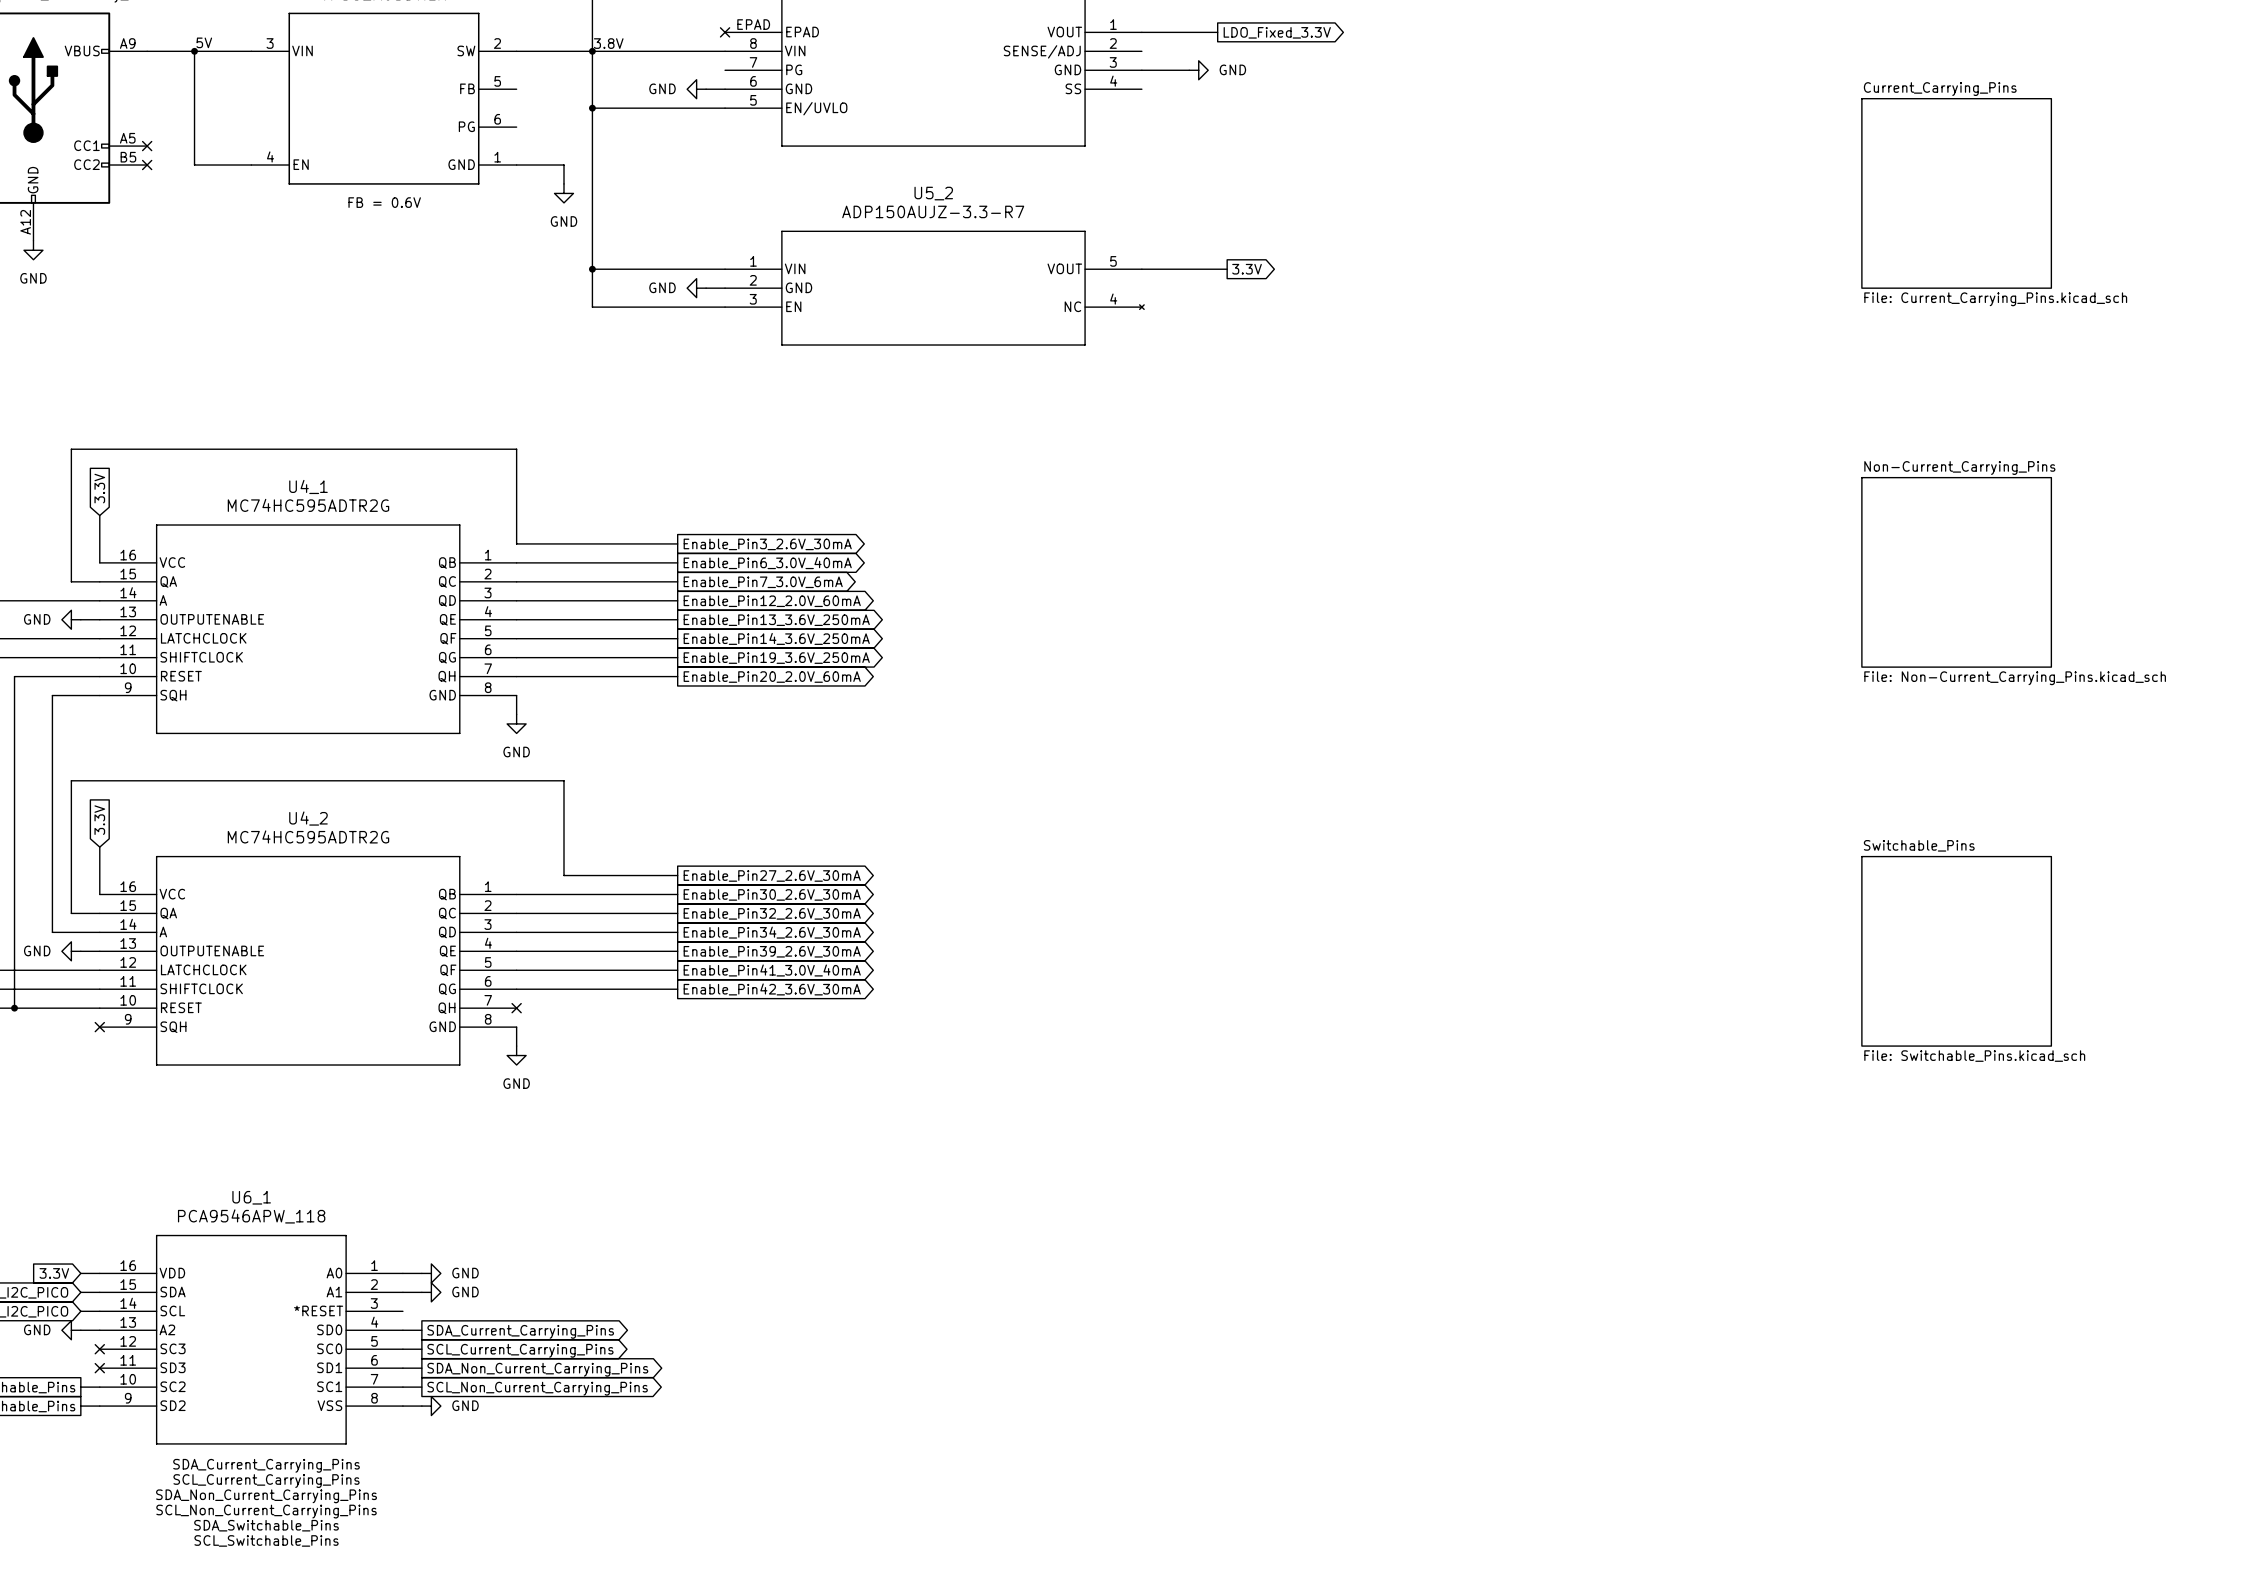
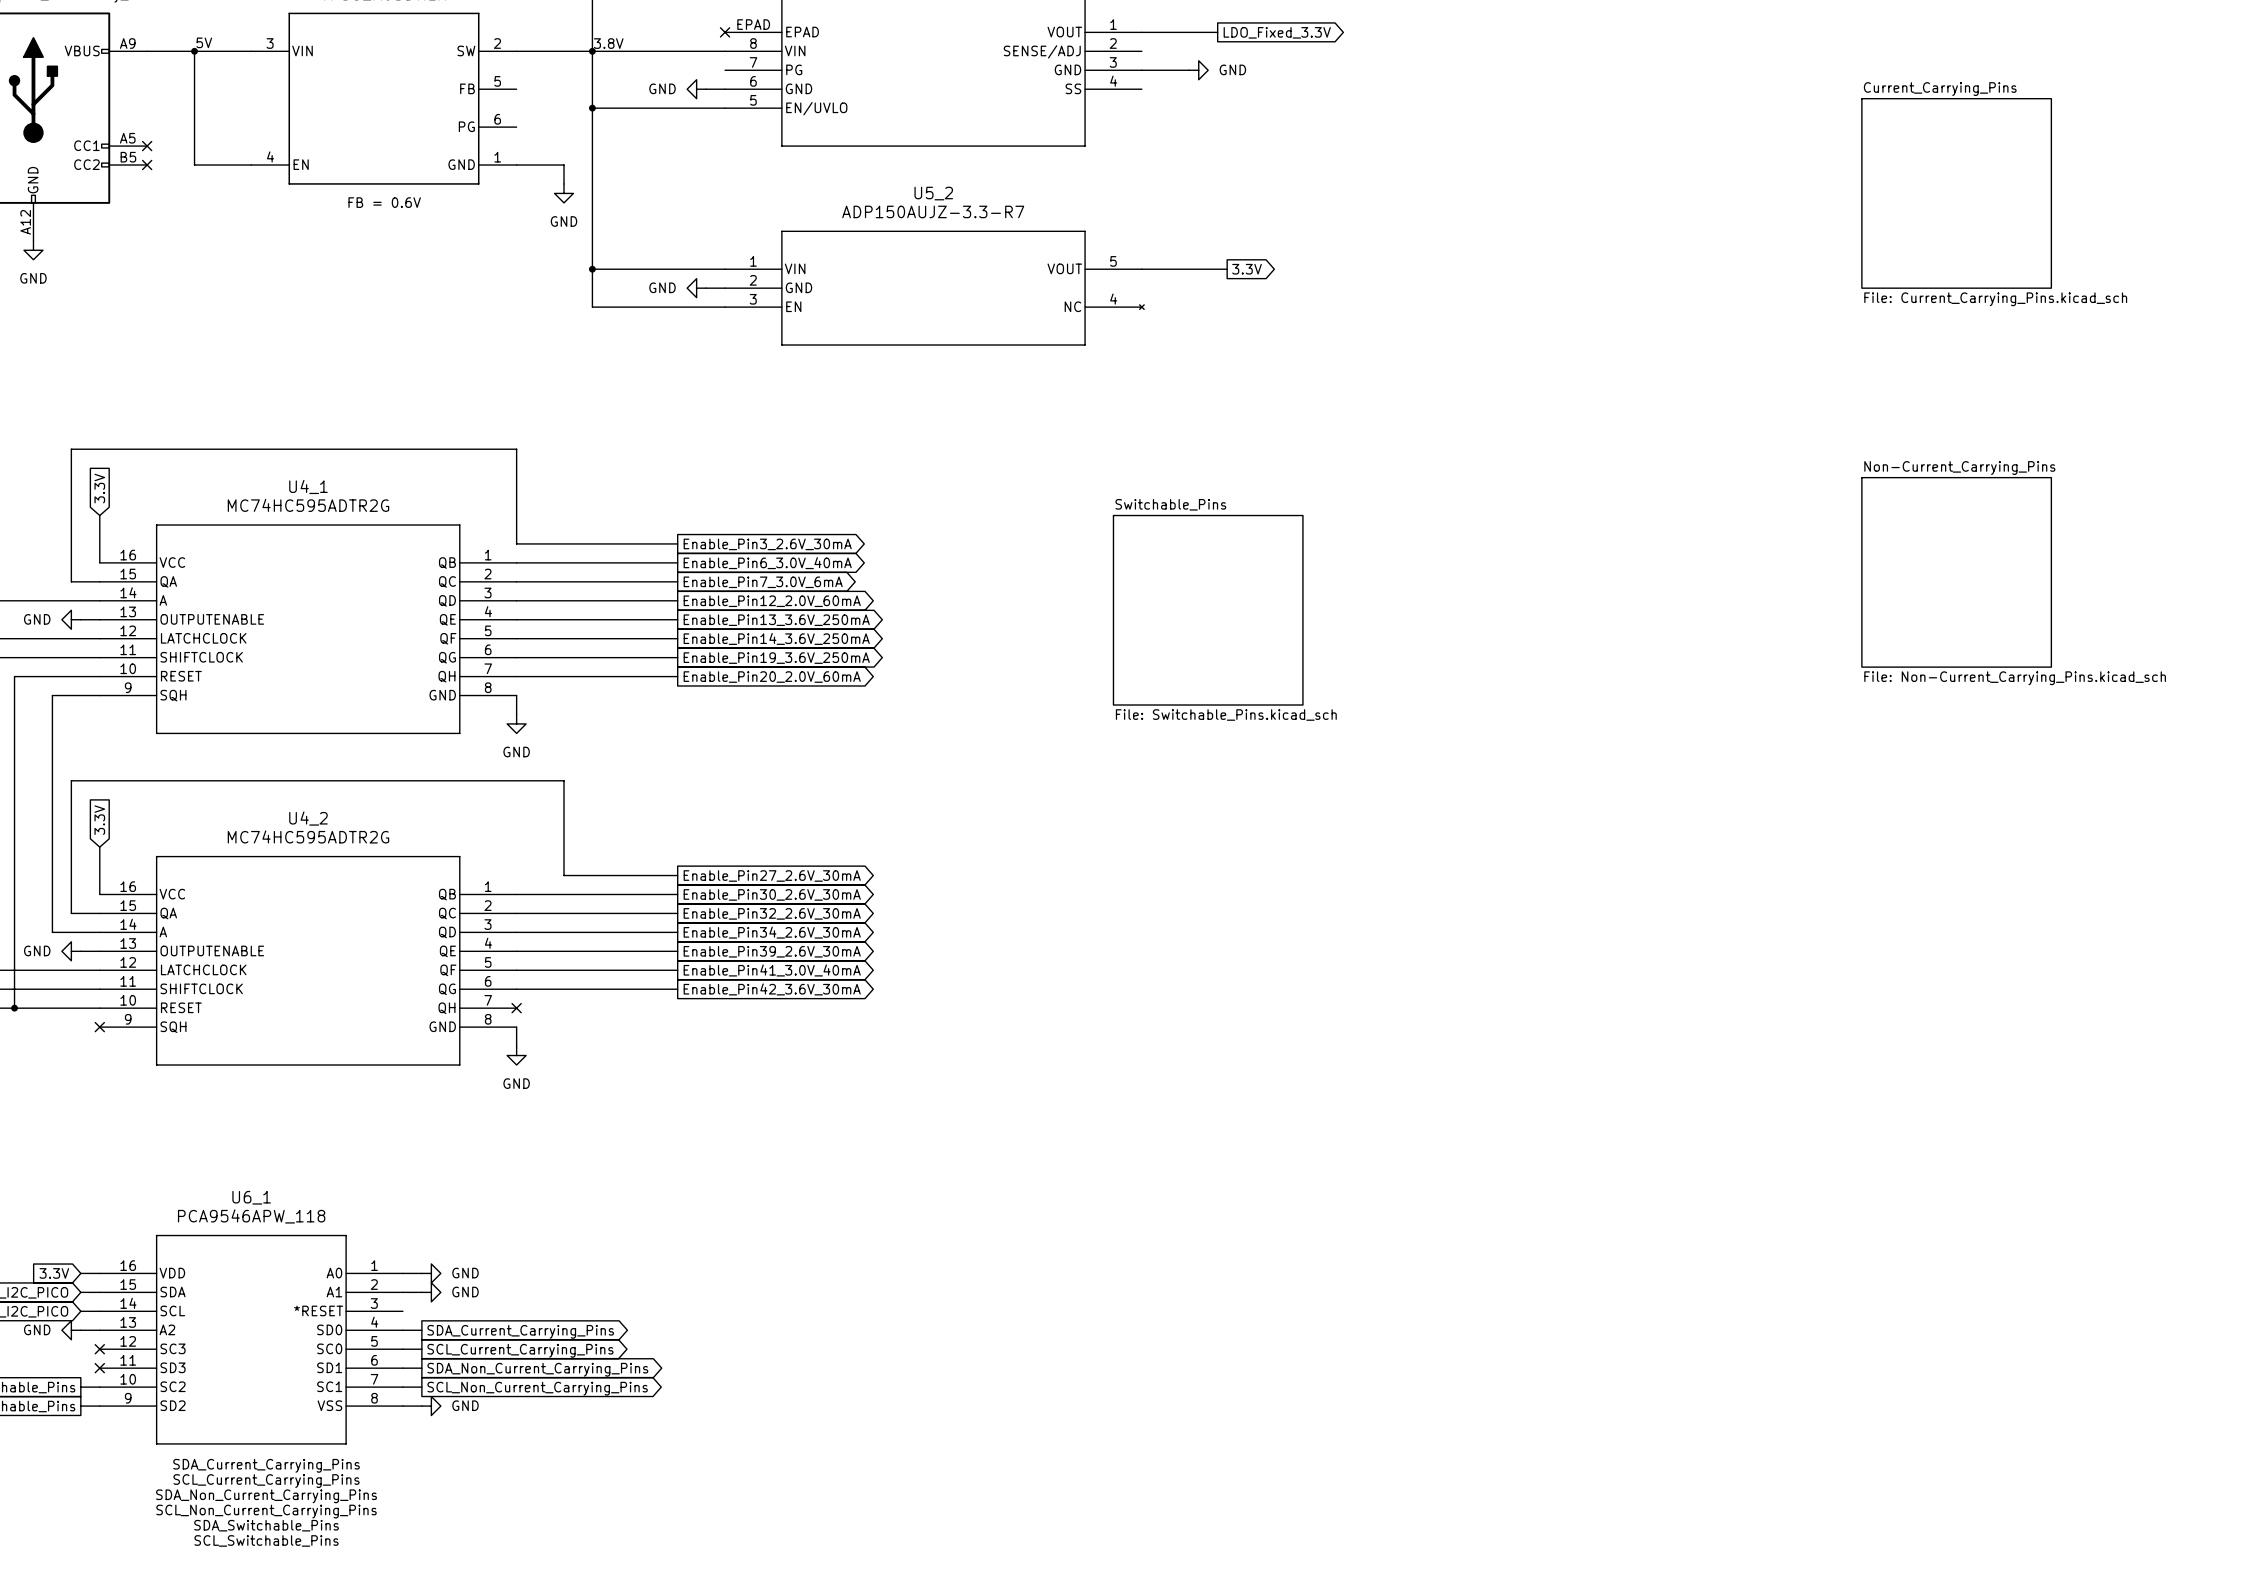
sheet Switchable_Pins: none -> File: Switchable_Pins.kicad_sch (1208, 610)
sheet Switchable_Pins: File: Switchable_Pins.kicad_sch (1956, 951) -> none

